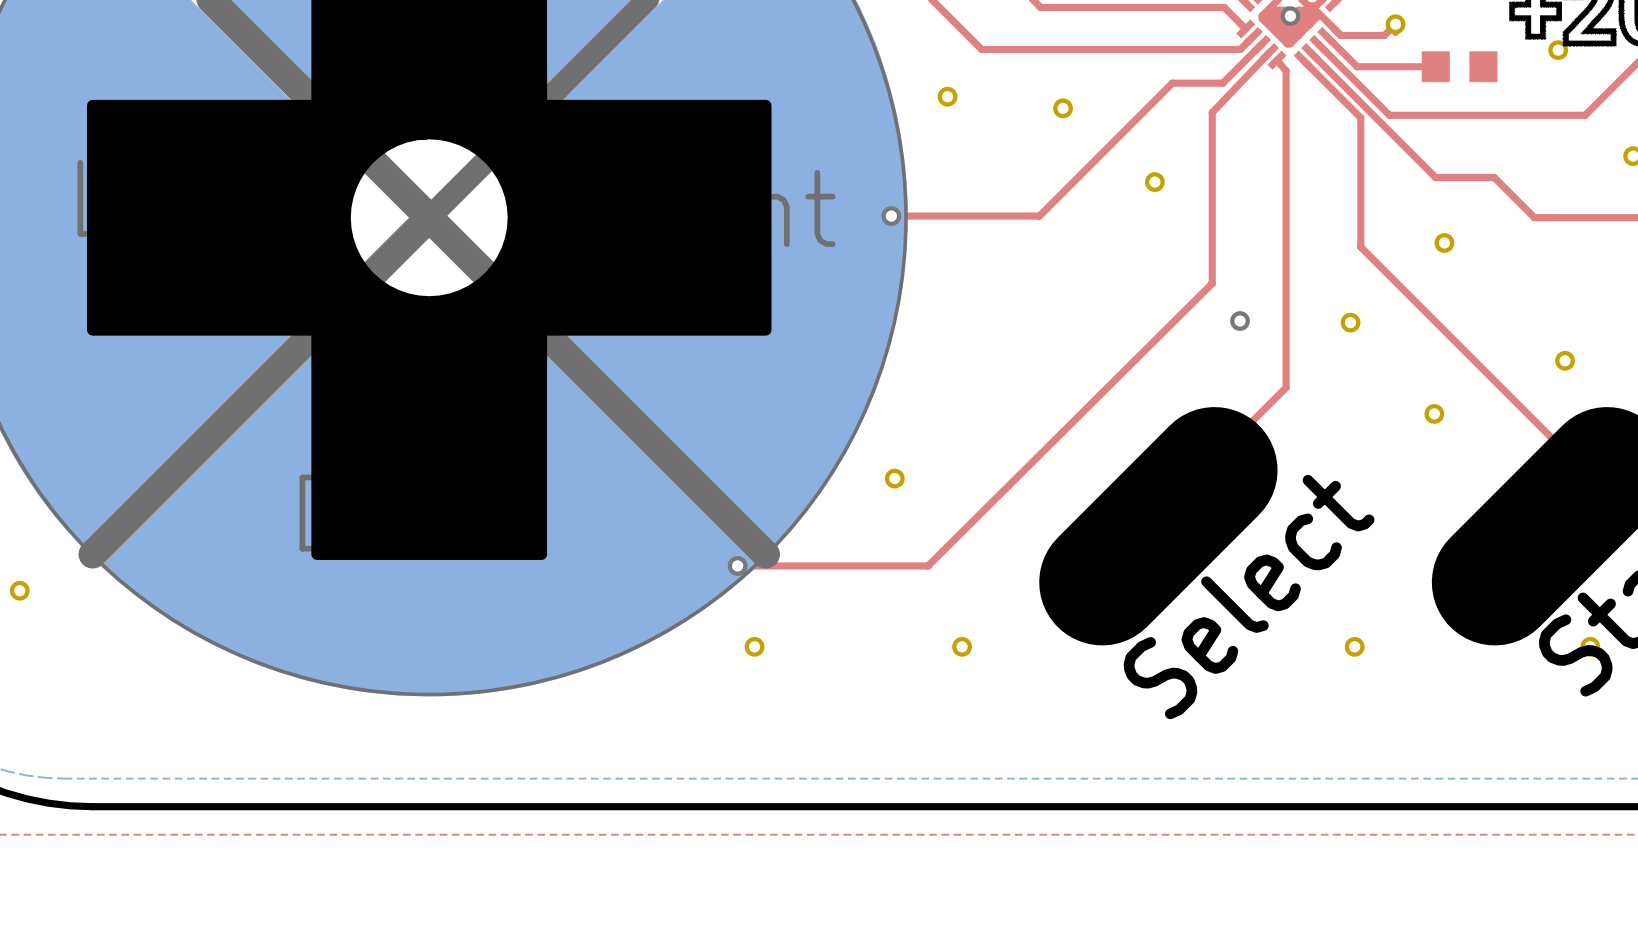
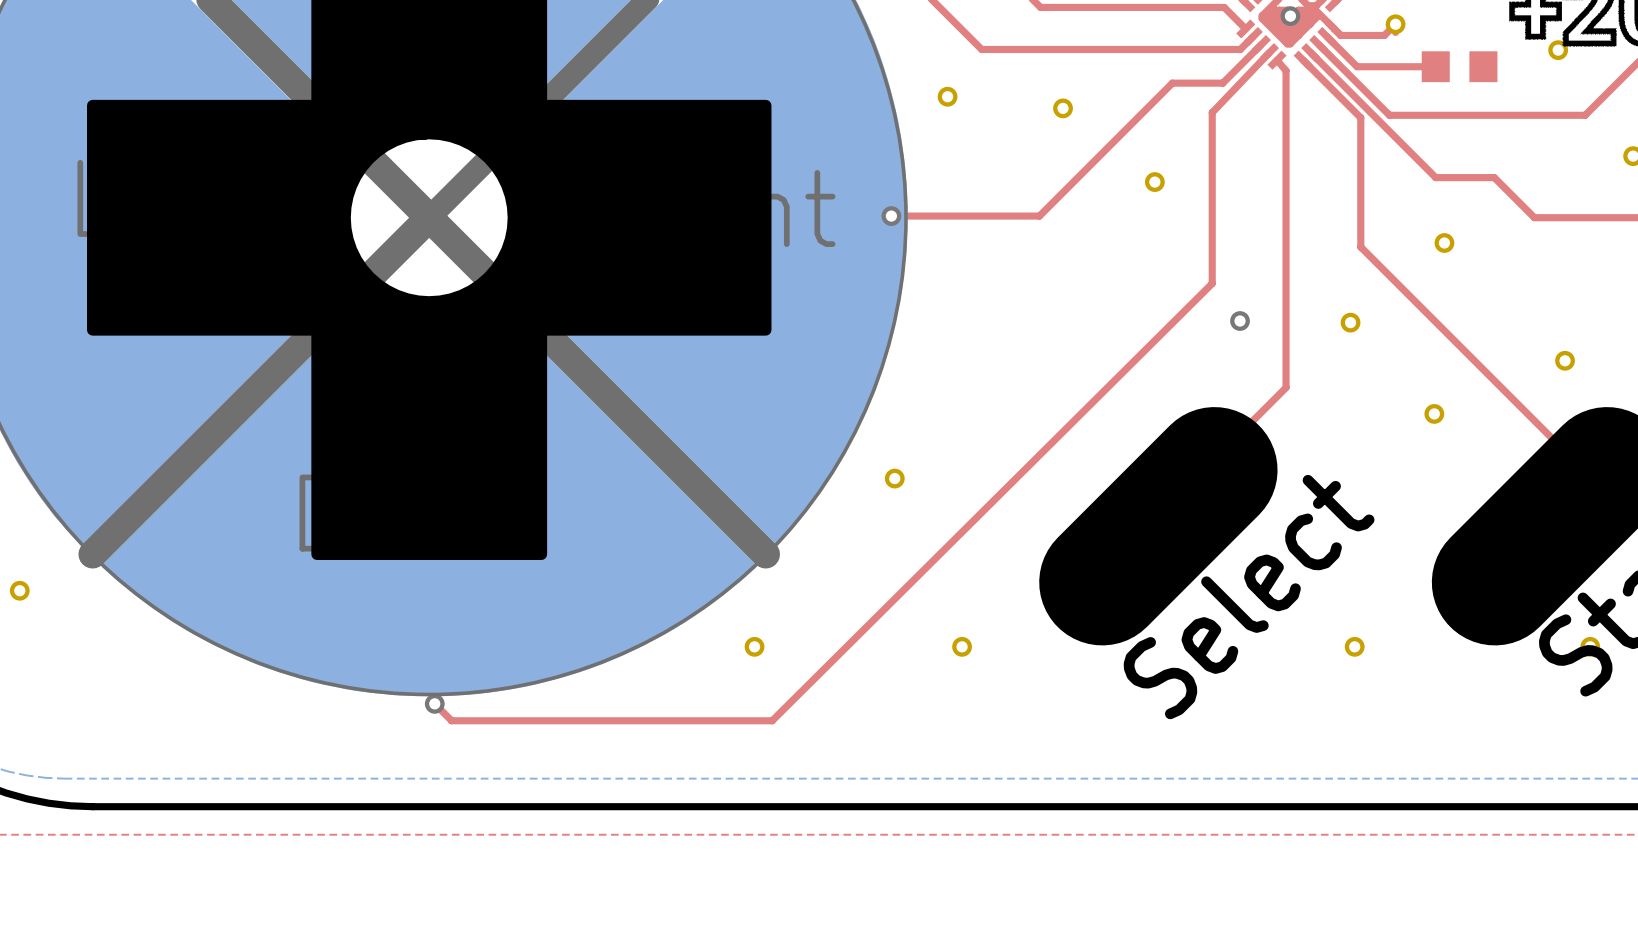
top track: (942, 551) (928, 565) (737, 565) -> (942, 551) (772, 720) (451, 720) (434, 703)
via: (737, 565) -> none
via: none -> (434, 703)

